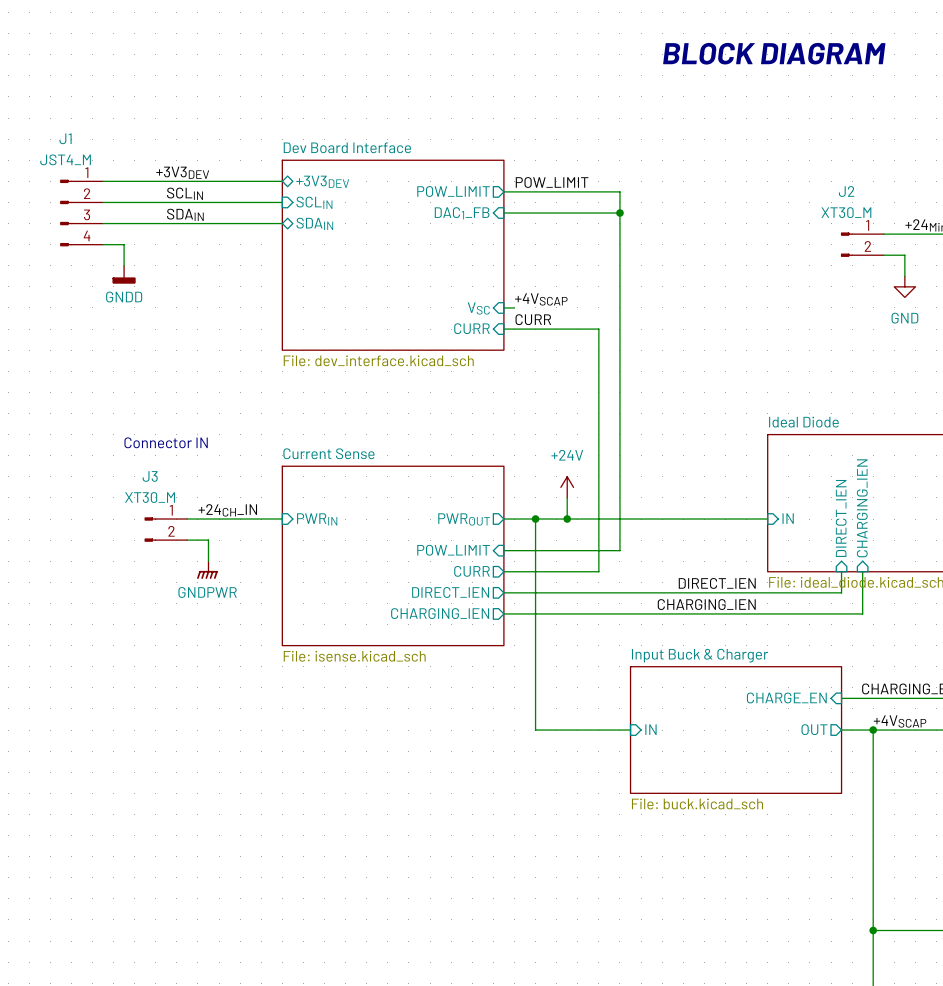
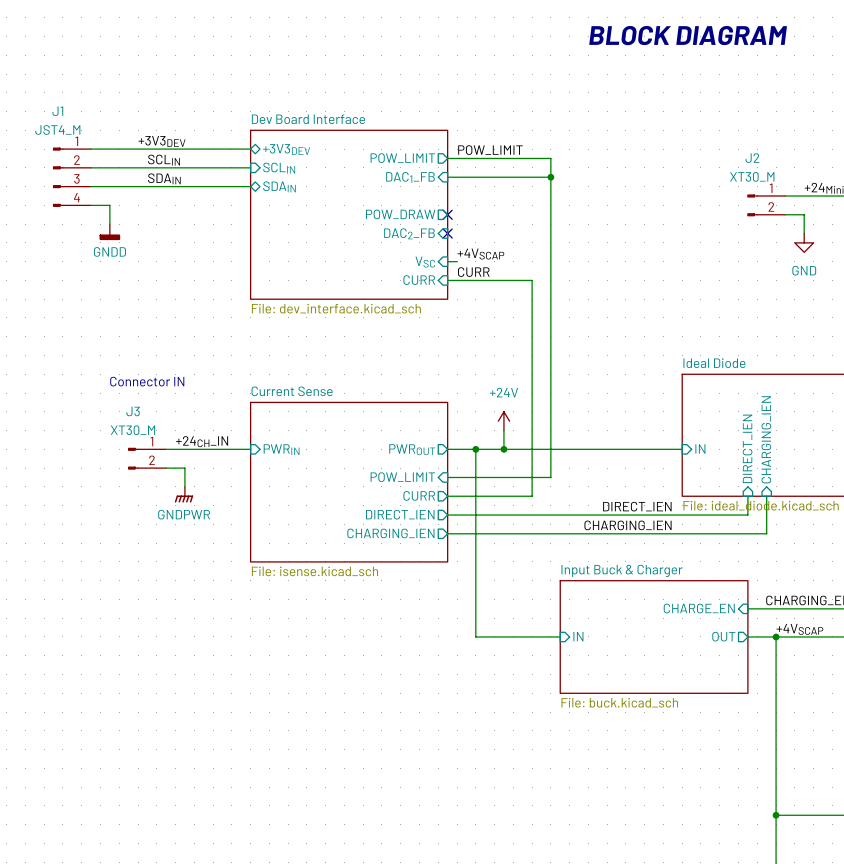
sheet pin: none -> POW_DRAW (400, 214)
no-connect mark: none -> (447, 214)
sheet pin: none -> DAC2_FB (409, 233)
no-connect mark: none -> (447, 233)

